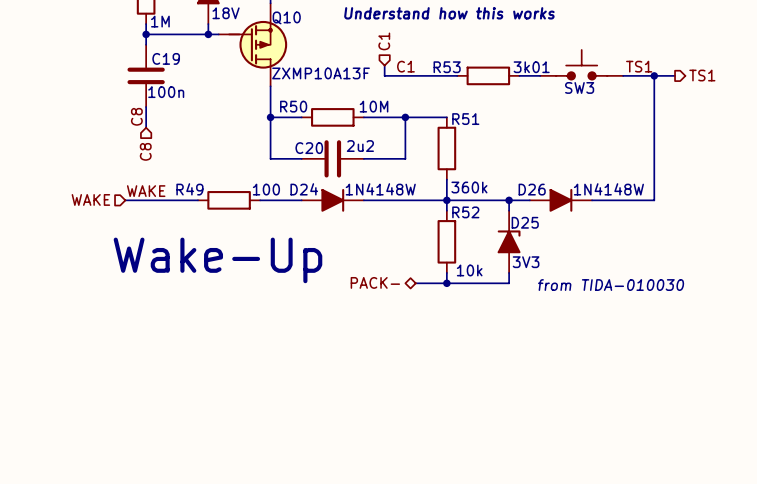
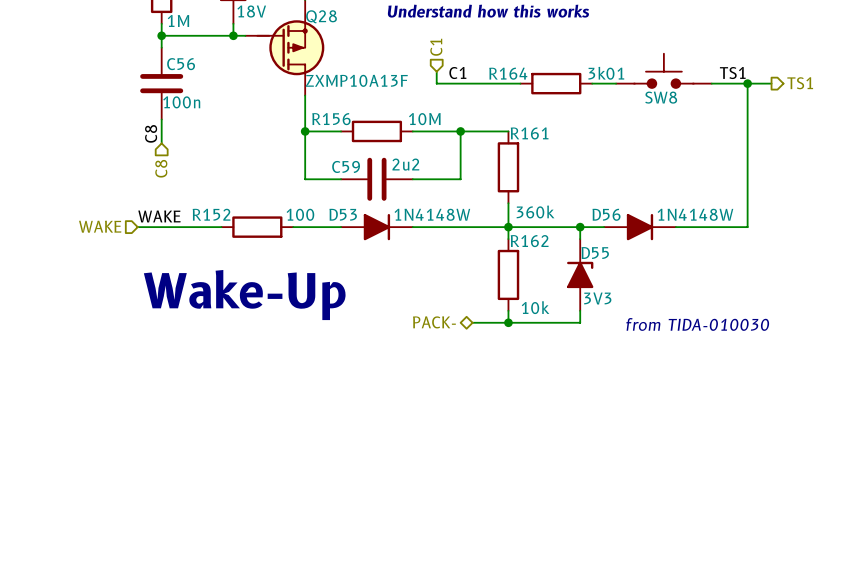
Q10 name: Q10 (286, 17) -> Q28 (321, 16)
C19 name: C19 (166, 58) -> C56 (181, 64)
R53 name: R53 (447, 67) -> R164 (508, 73)
SW3 name: SW3 (579, 87) -> SW8 (661, 97)
R50 name: R50 (293, 106) -> R156 (331, 119)
R51 name: R51 (465, 119) -> R161 (529, 133)
C20 name: C20 (309, 148) -> C59 (346, 166)
R49 name: R49 (189, 189) -> R152 (211, 214)
D24 name: D24 (304, 189) -> D53 (343, 214)
D26 name: D26 (532, 189) -> D56 (606, 214)
R52 name: R52 (465, 212) -> R162 (529, 241)
D25 name: D25 (525, 222) -> D55 (595, 253)

